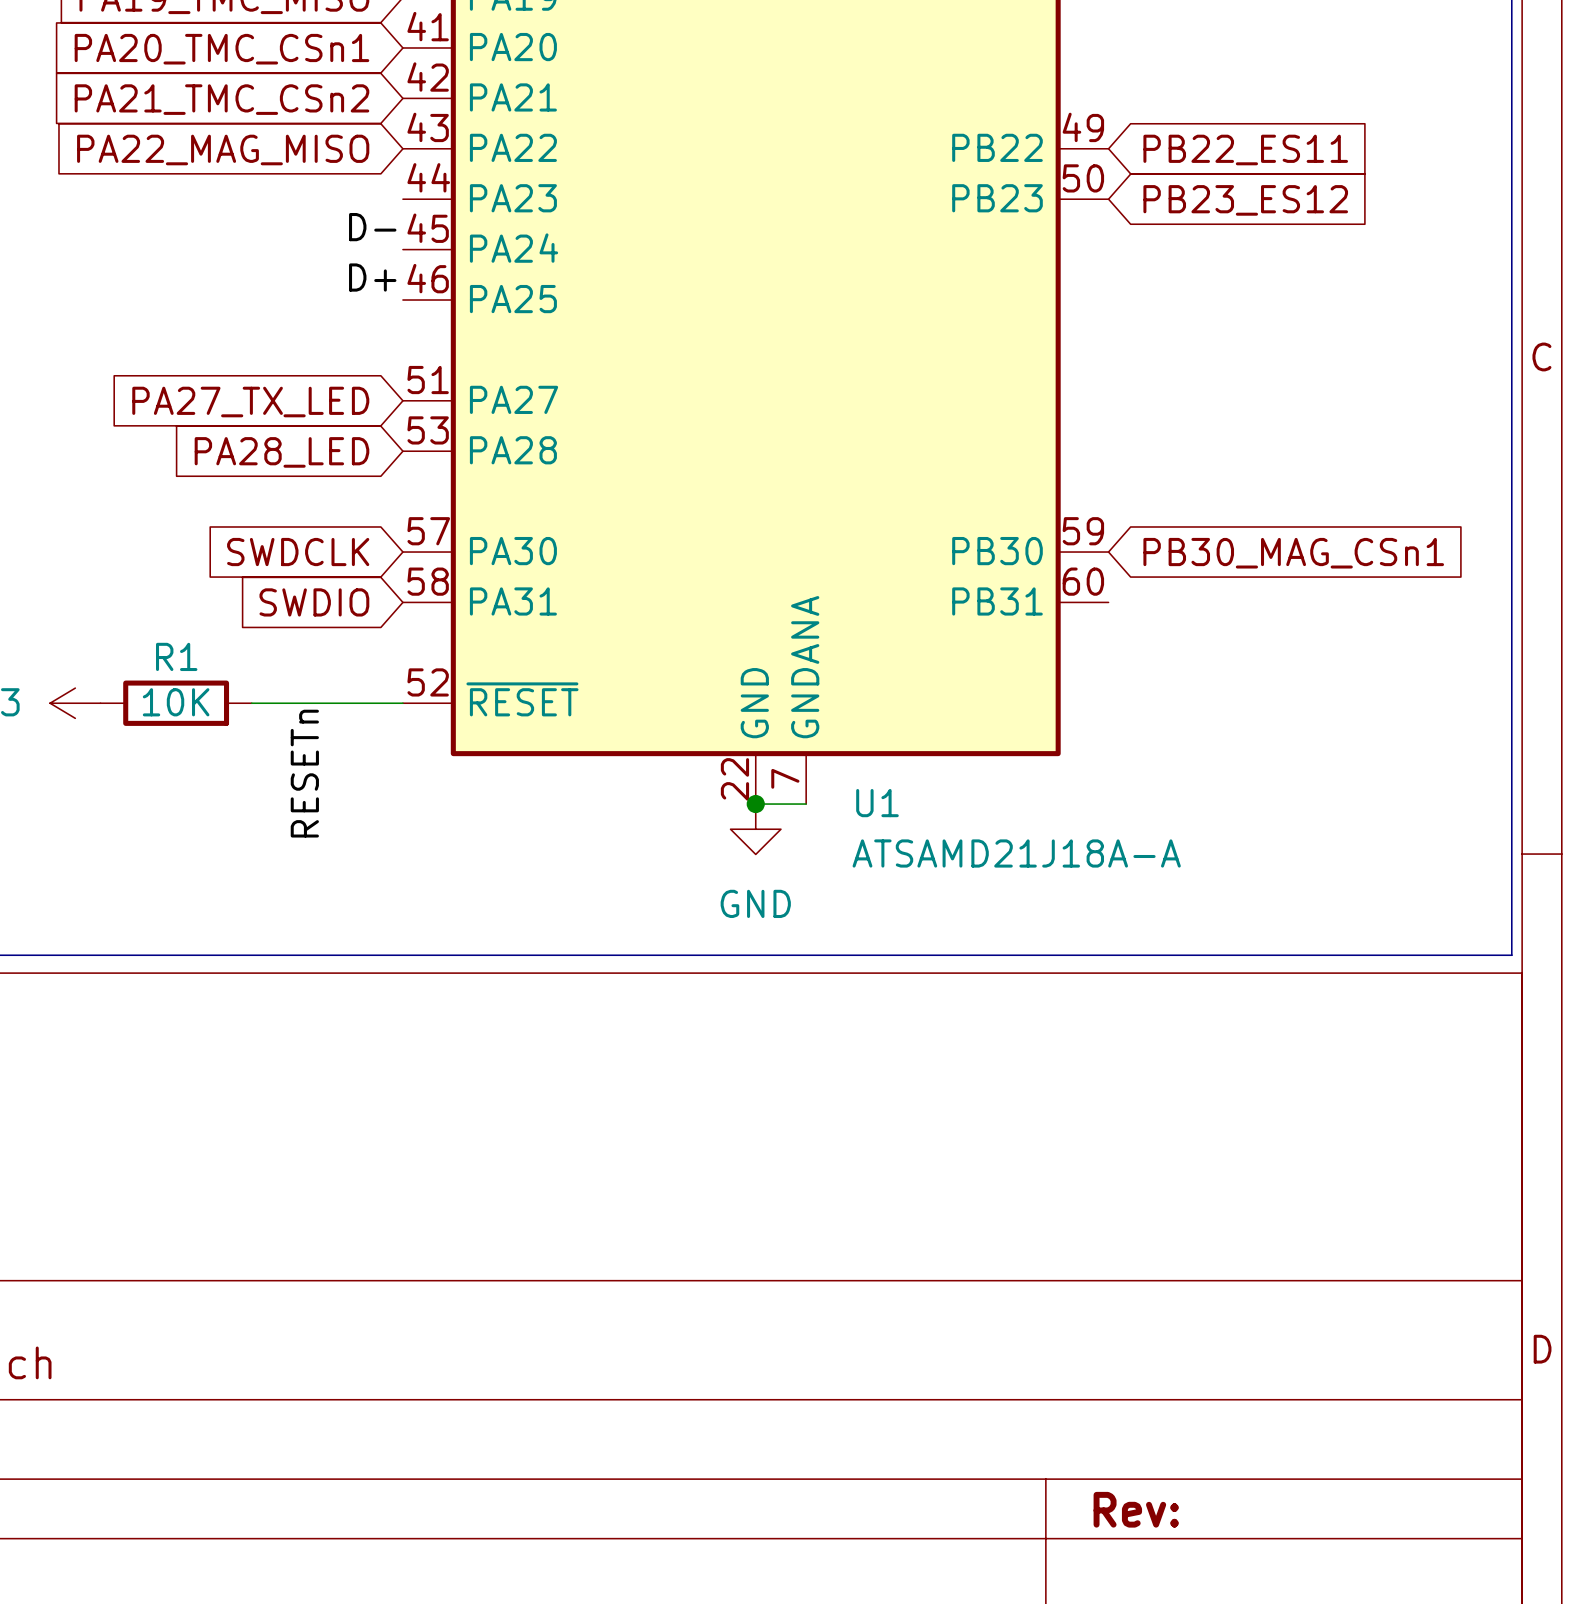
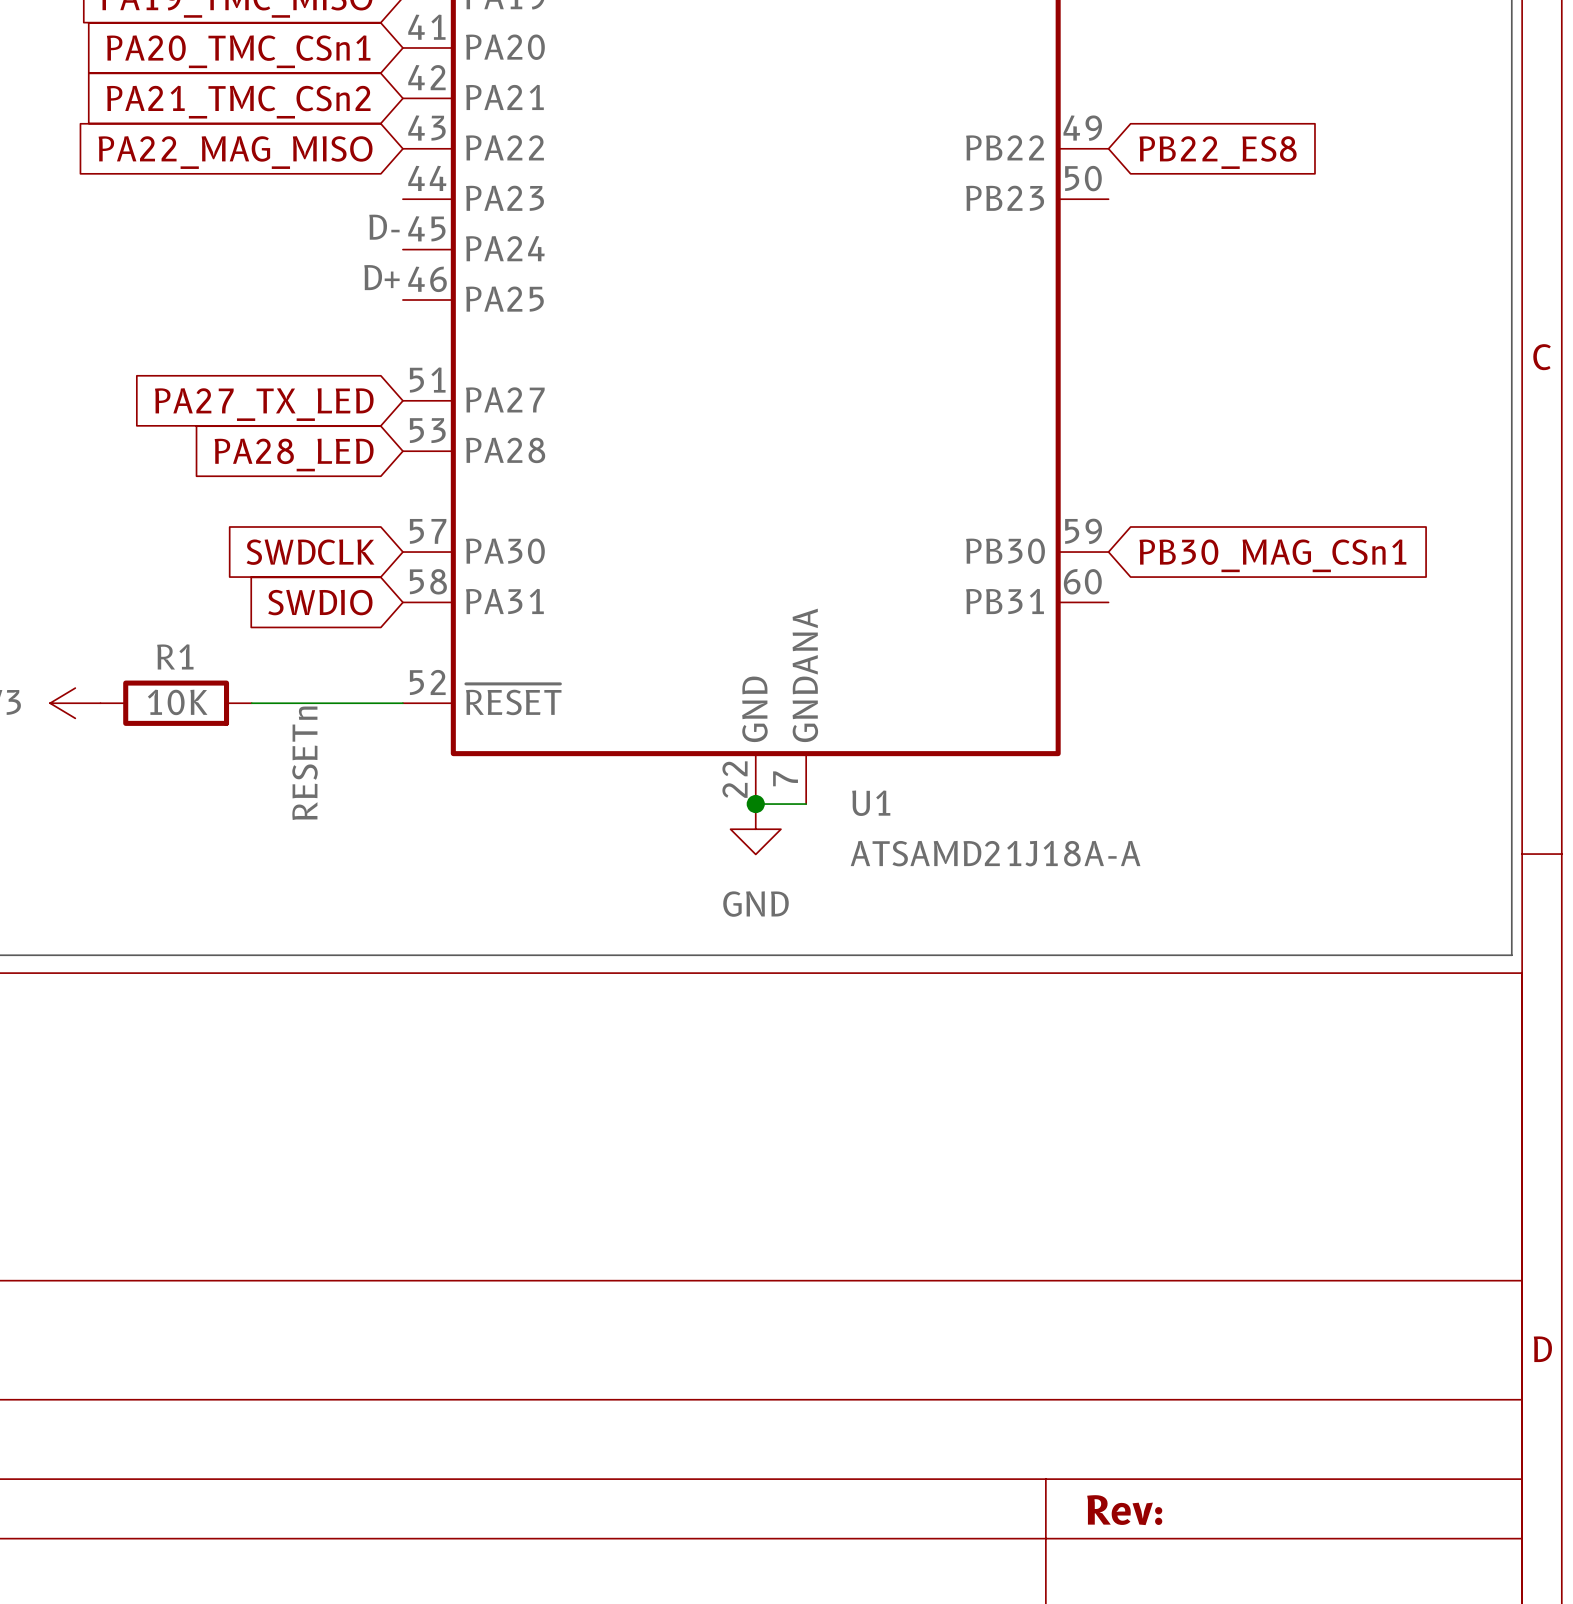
global label: PB22_ES11 (1245, 150) -> PB22_ES8 (1218, 152)
global label: PB23_ES12 (1245, 200) -> none

